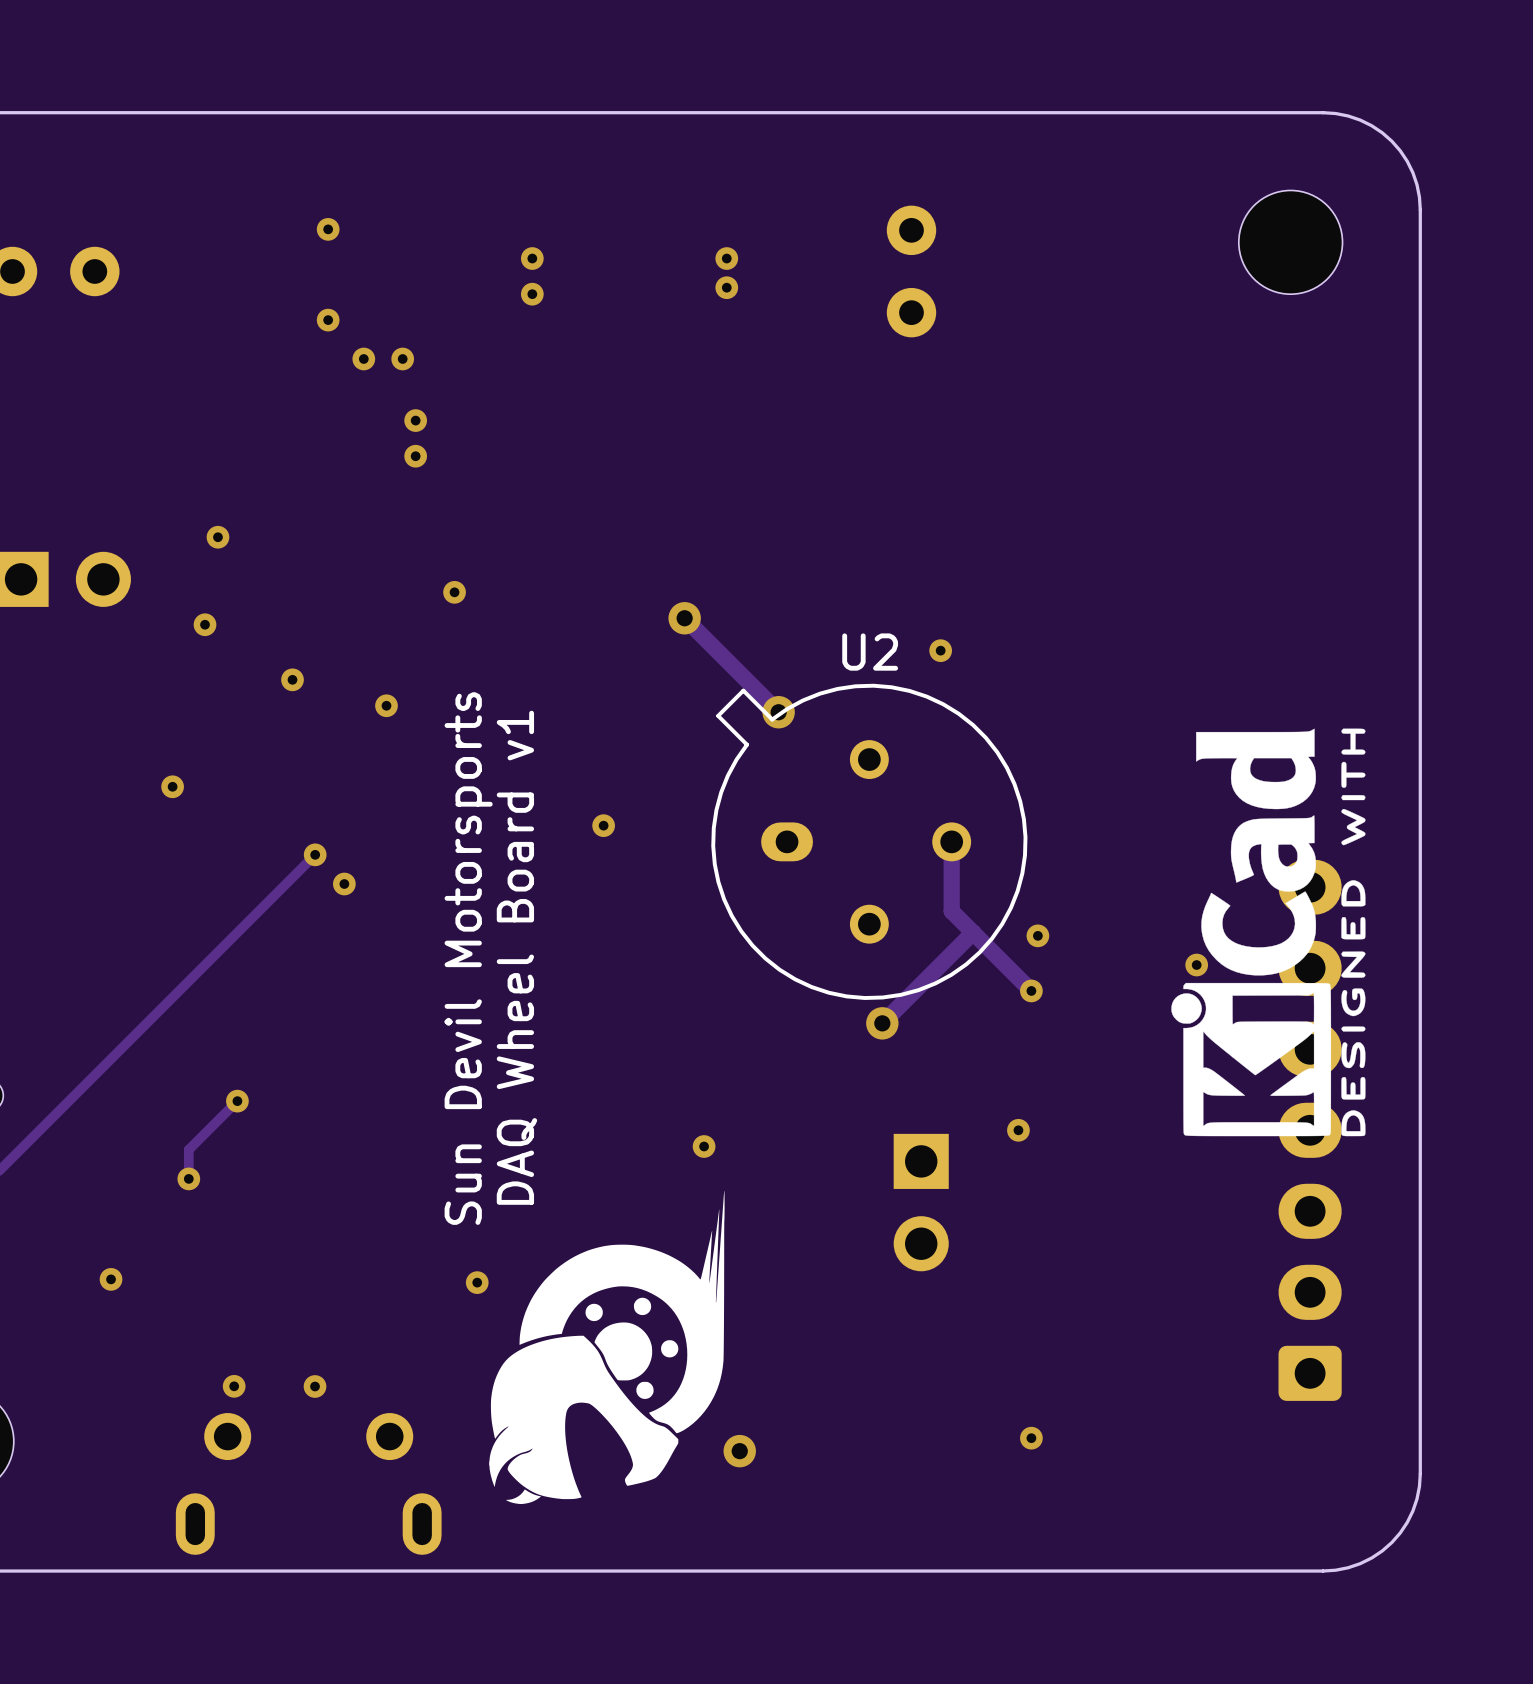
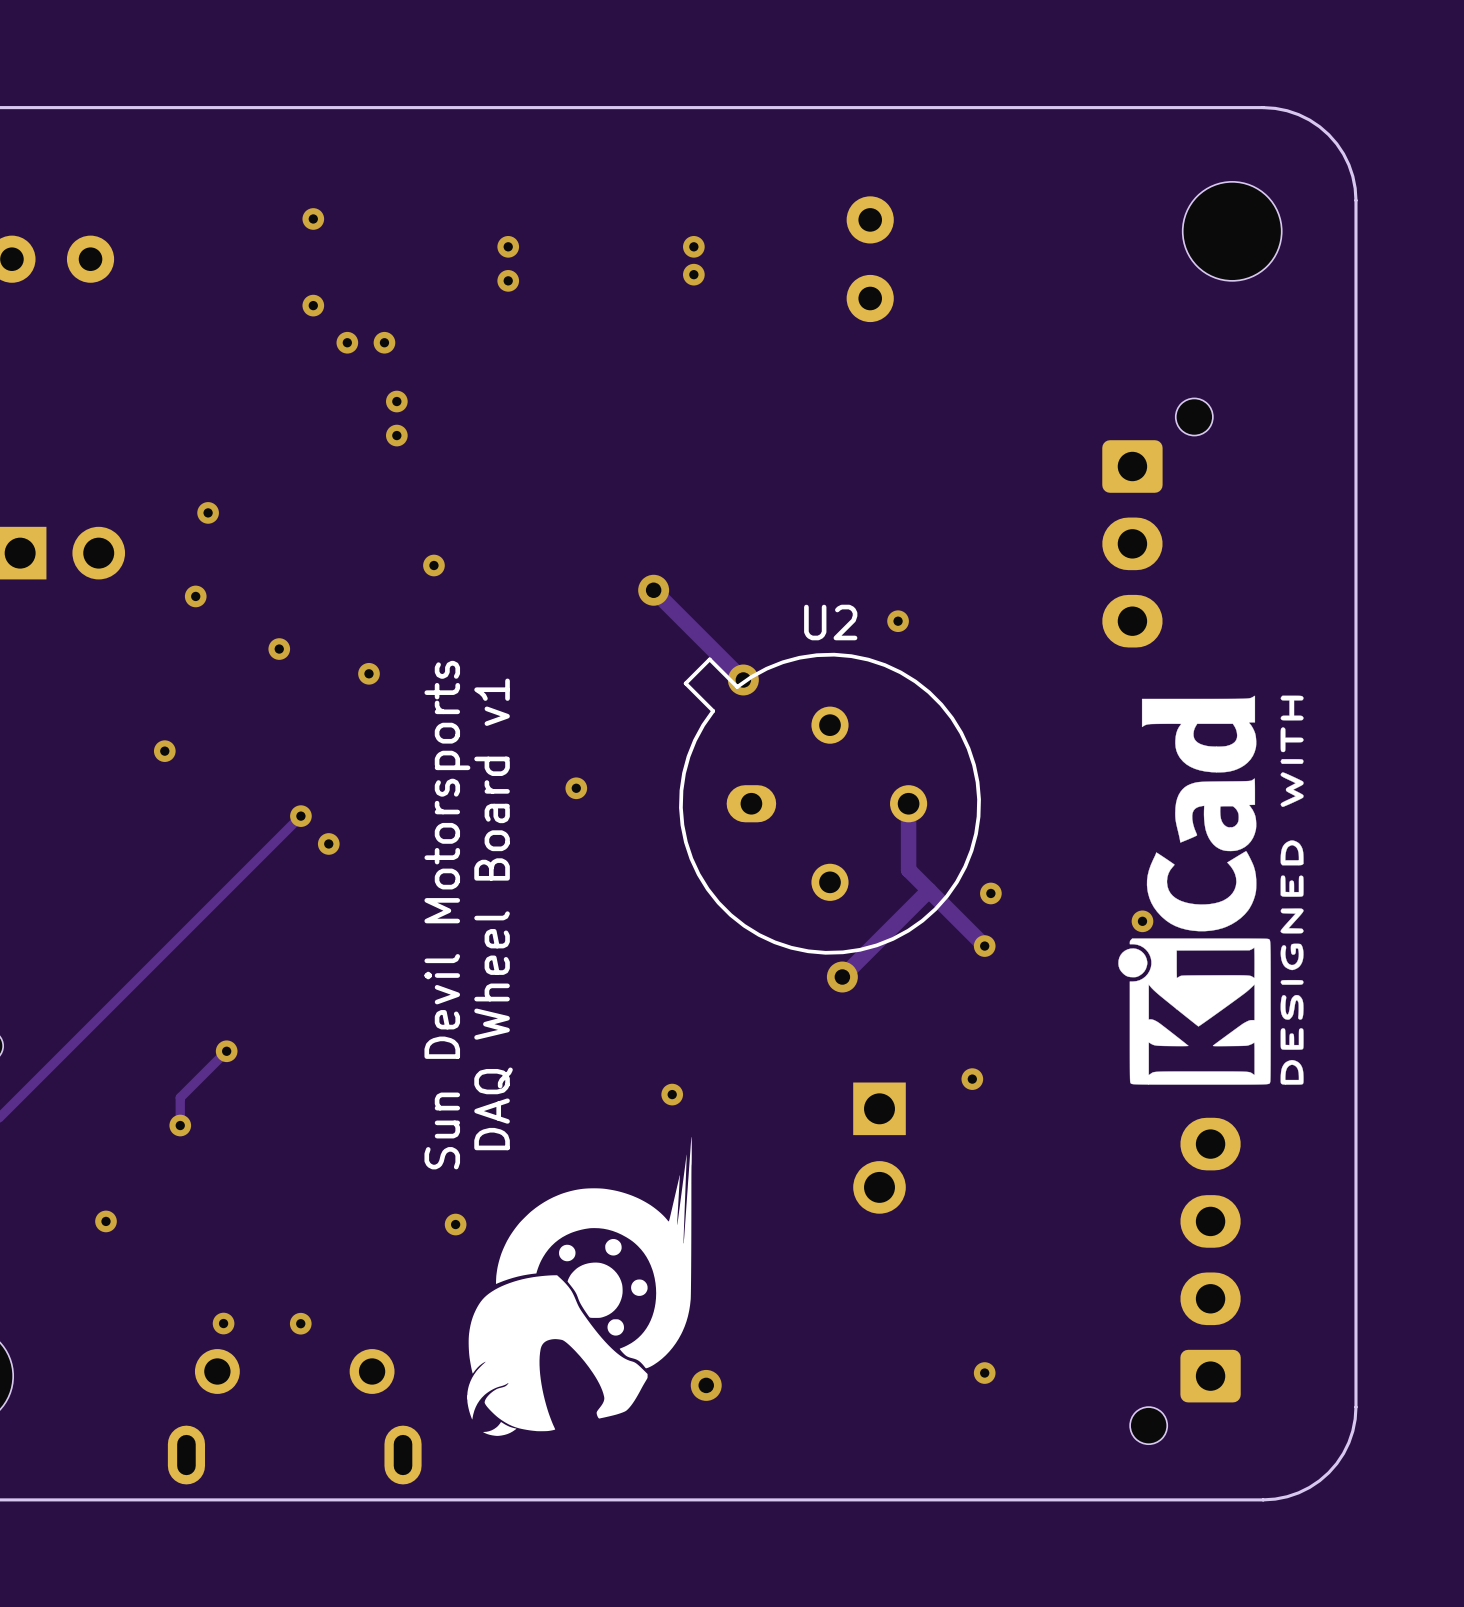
part: none -> (1157, 522)
part: (1310, 1130) -> none
part: none -> (1185, 1280)

